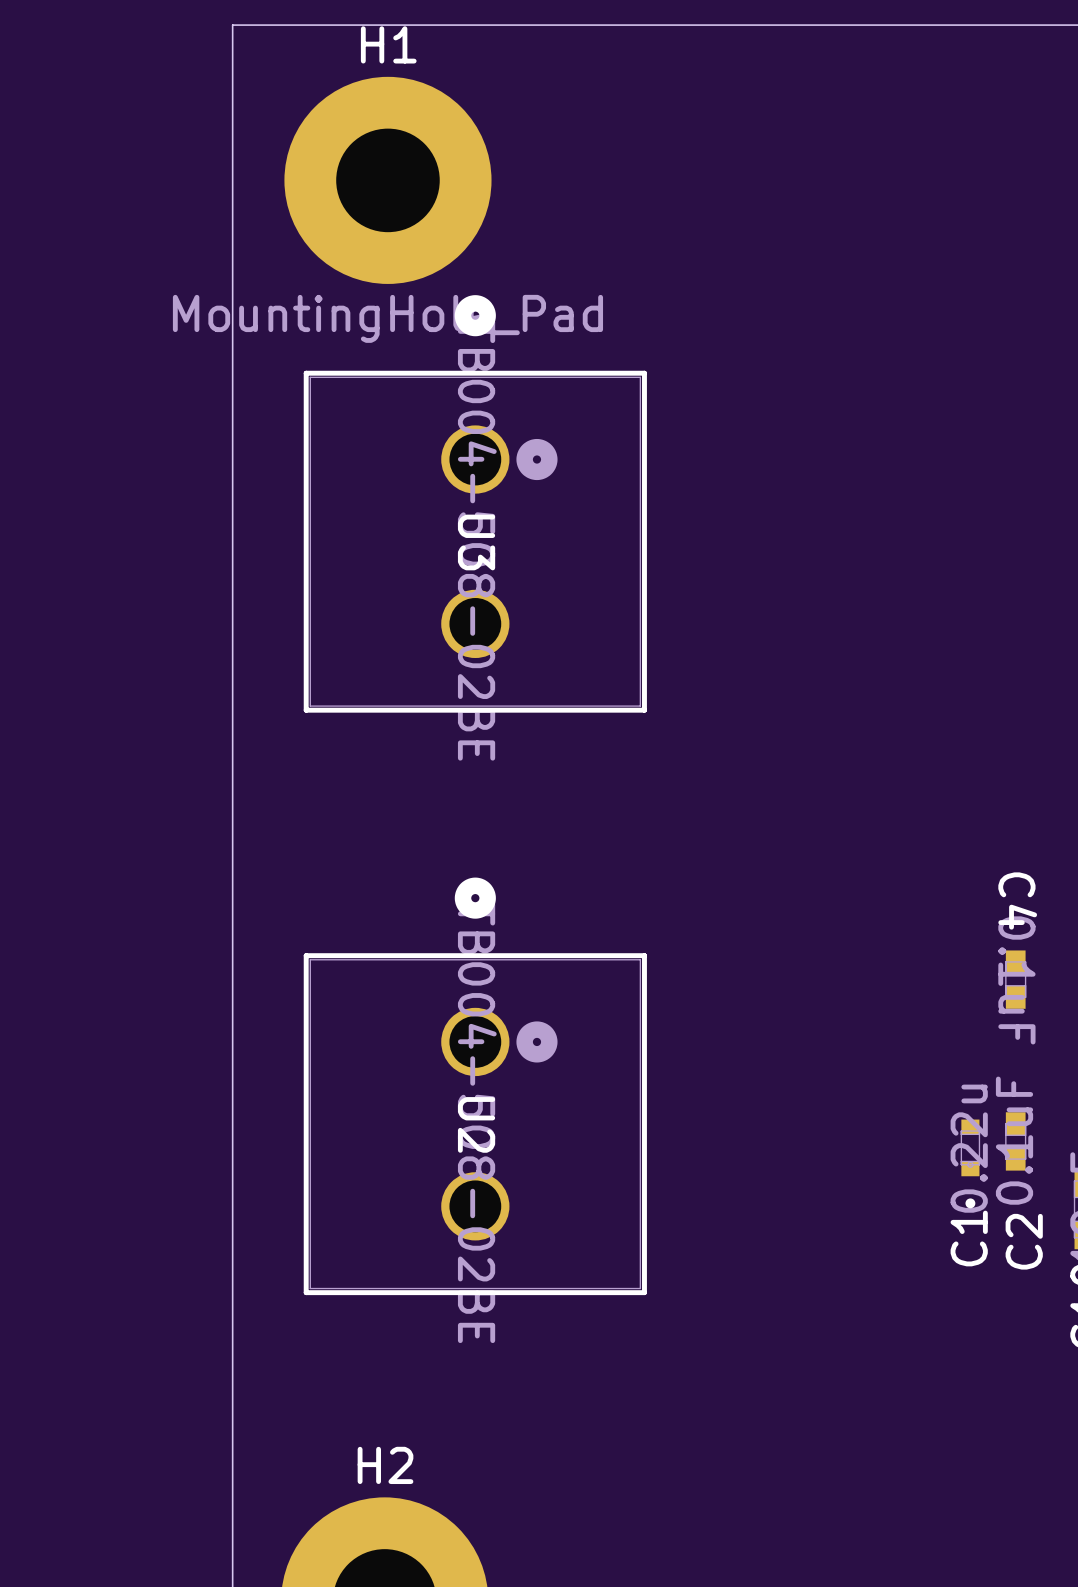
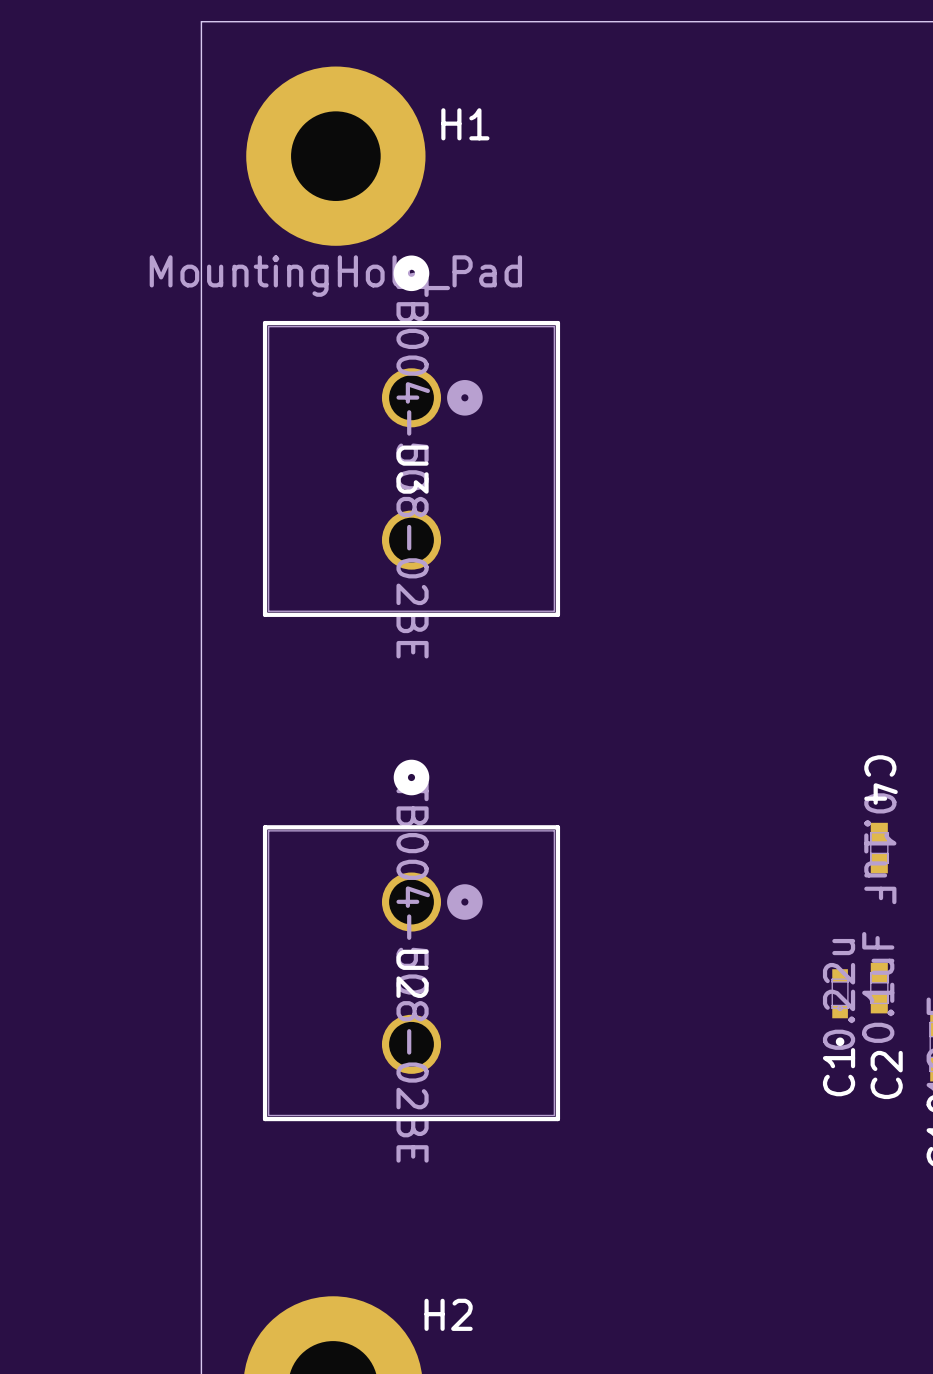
H1 name position: H1 (388, 44) -> H1 (465, 124)
H2 name position: H2 (385, 1465) -> H2 (448, 1314)

